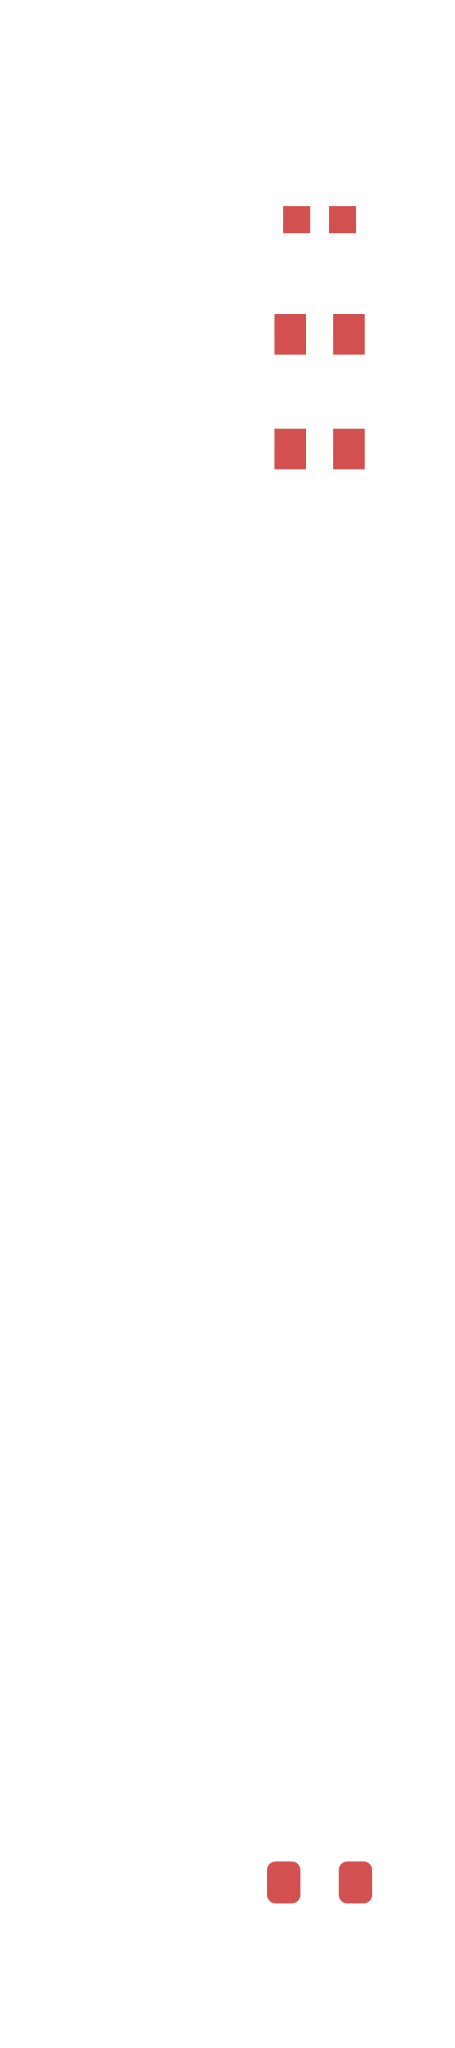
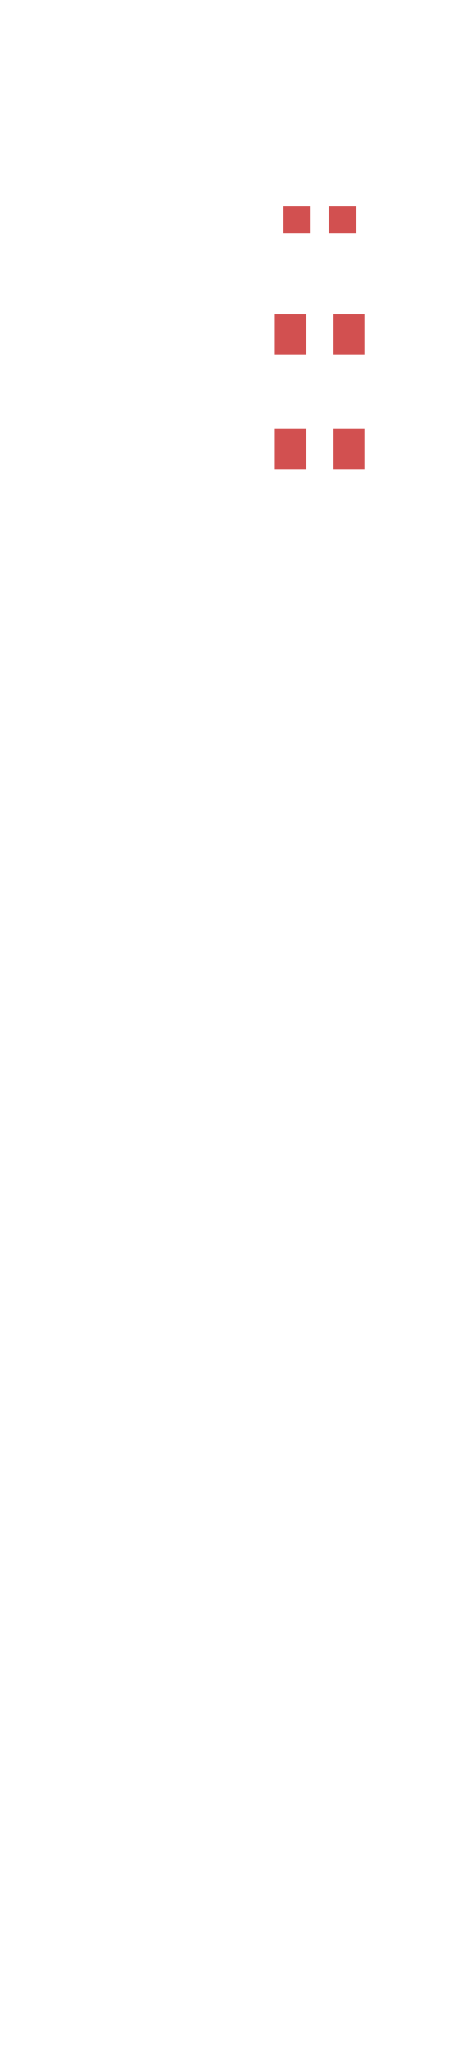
part: (319, 1882) -> none

